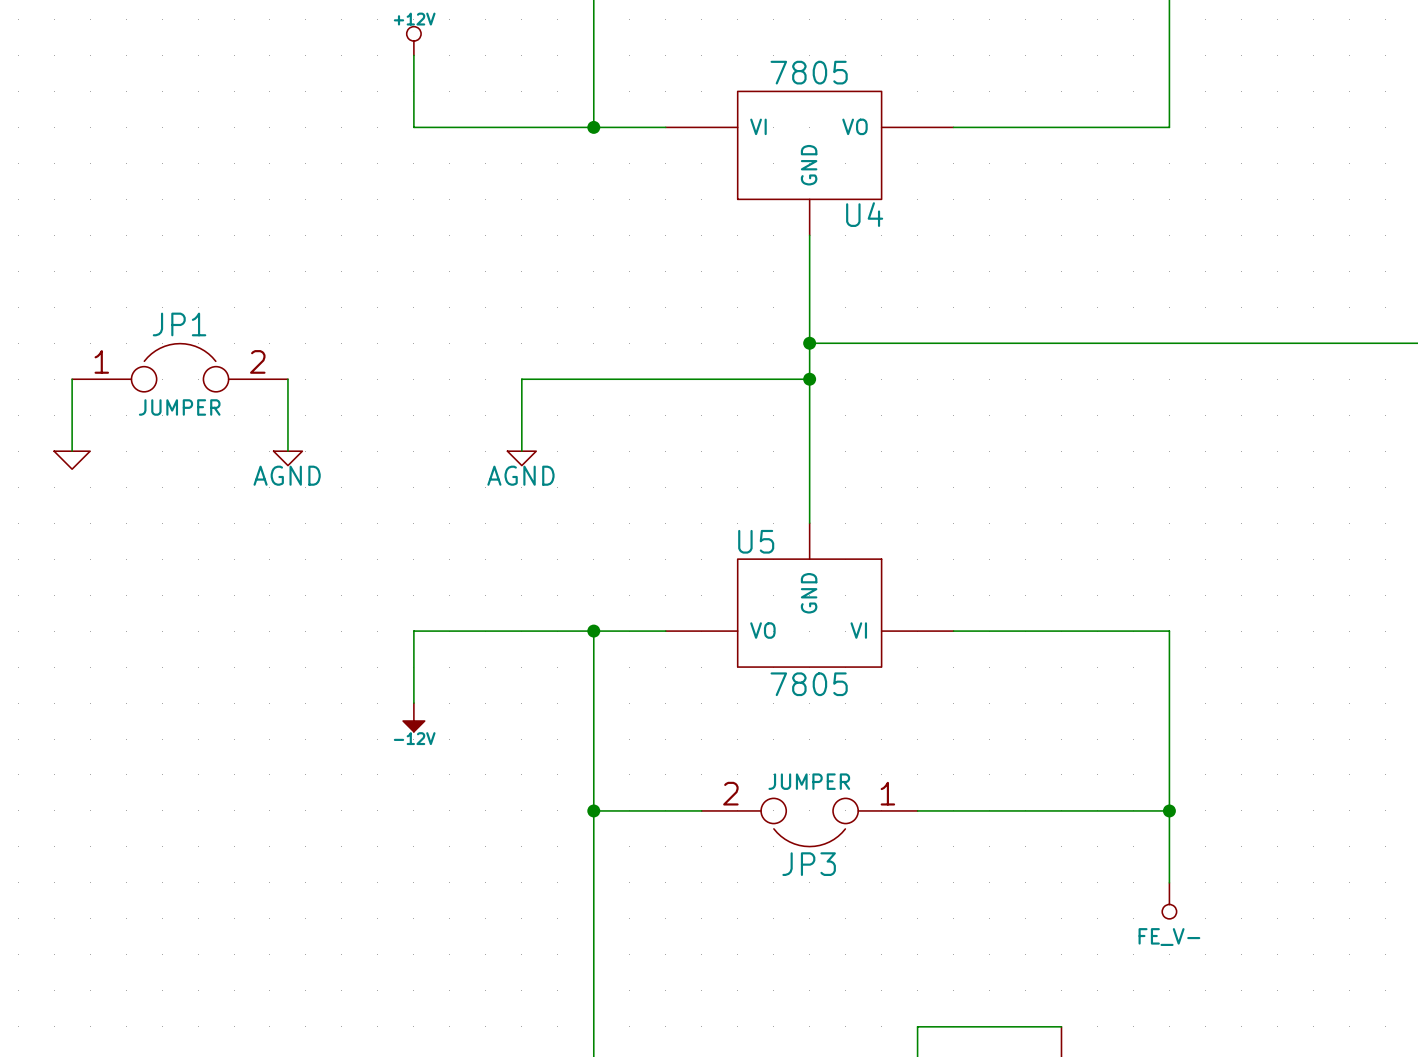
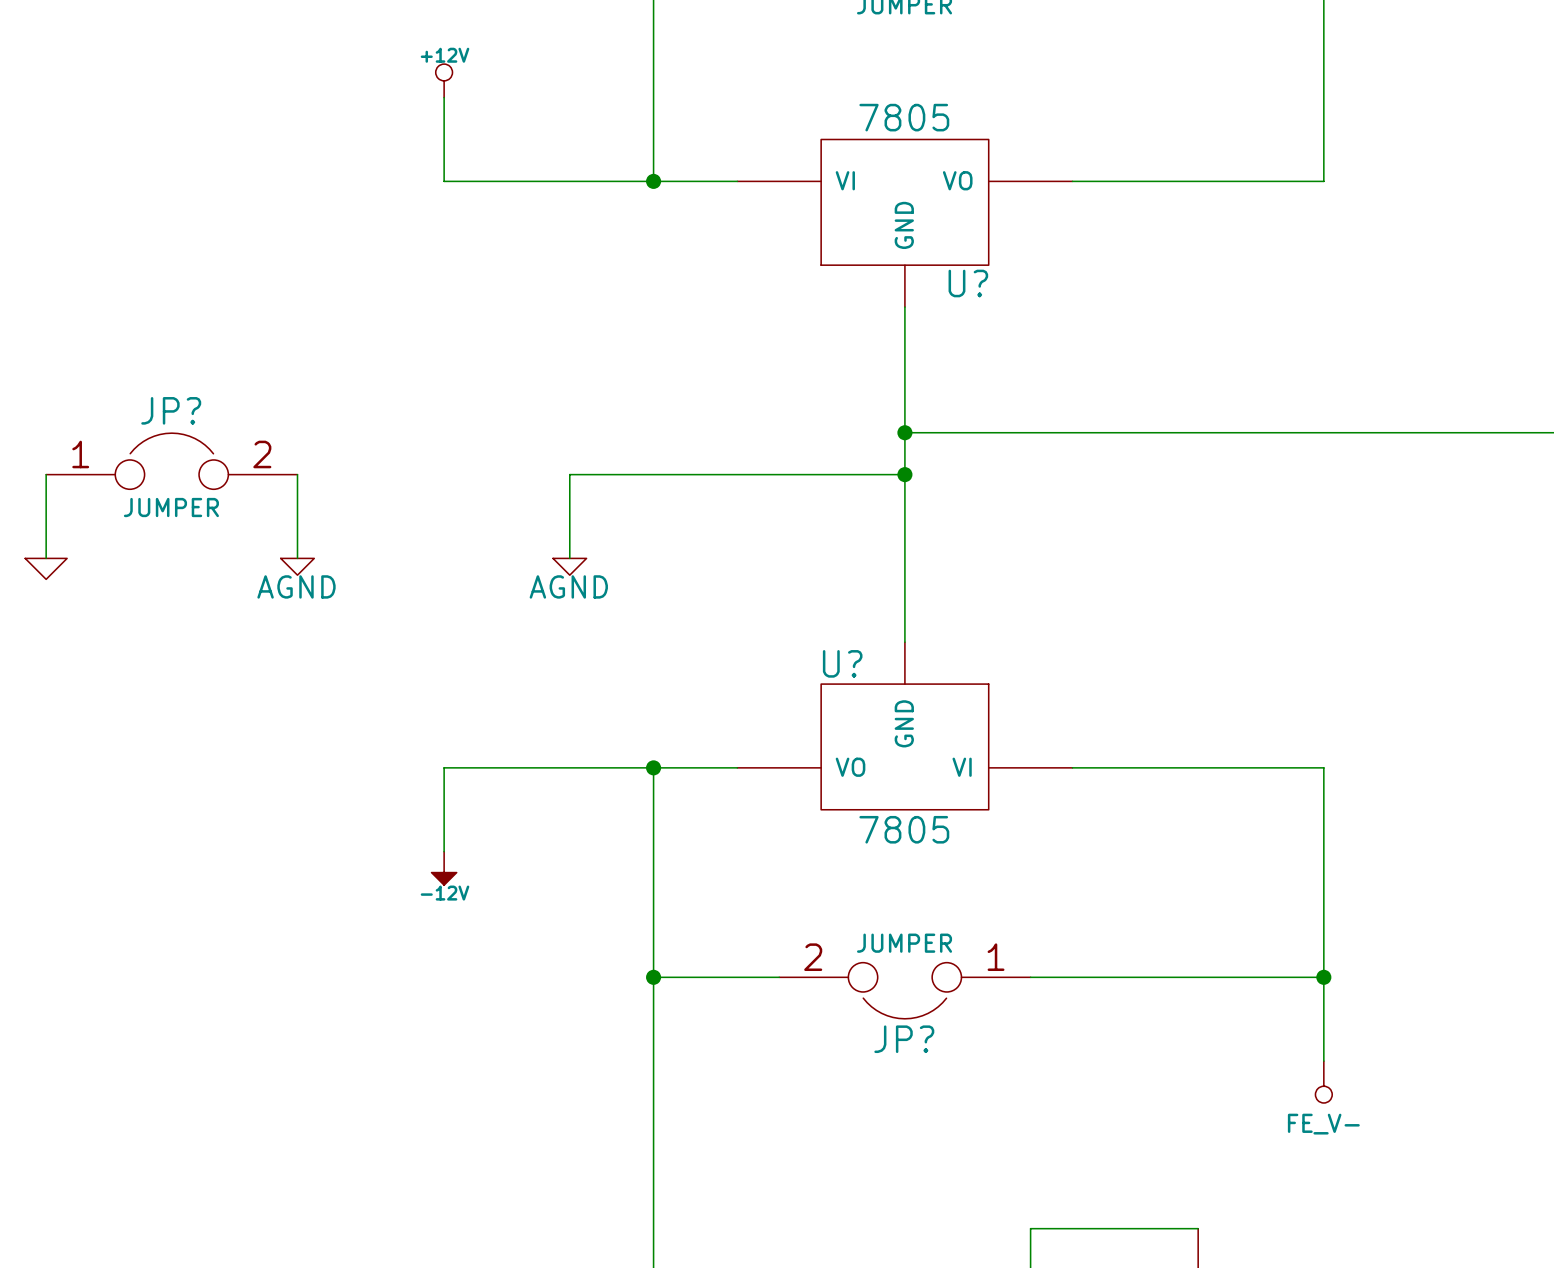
U4 name: U4 (864, 214) -> U? (968, 283)
JP1 name: JP1 (179, 324) -> JP? (171, 410)
U5 name: U5 (756, 541) -> U? (842, 663)
JP3 name: JP3 (809, 864) -> JP? (904, 1039)

